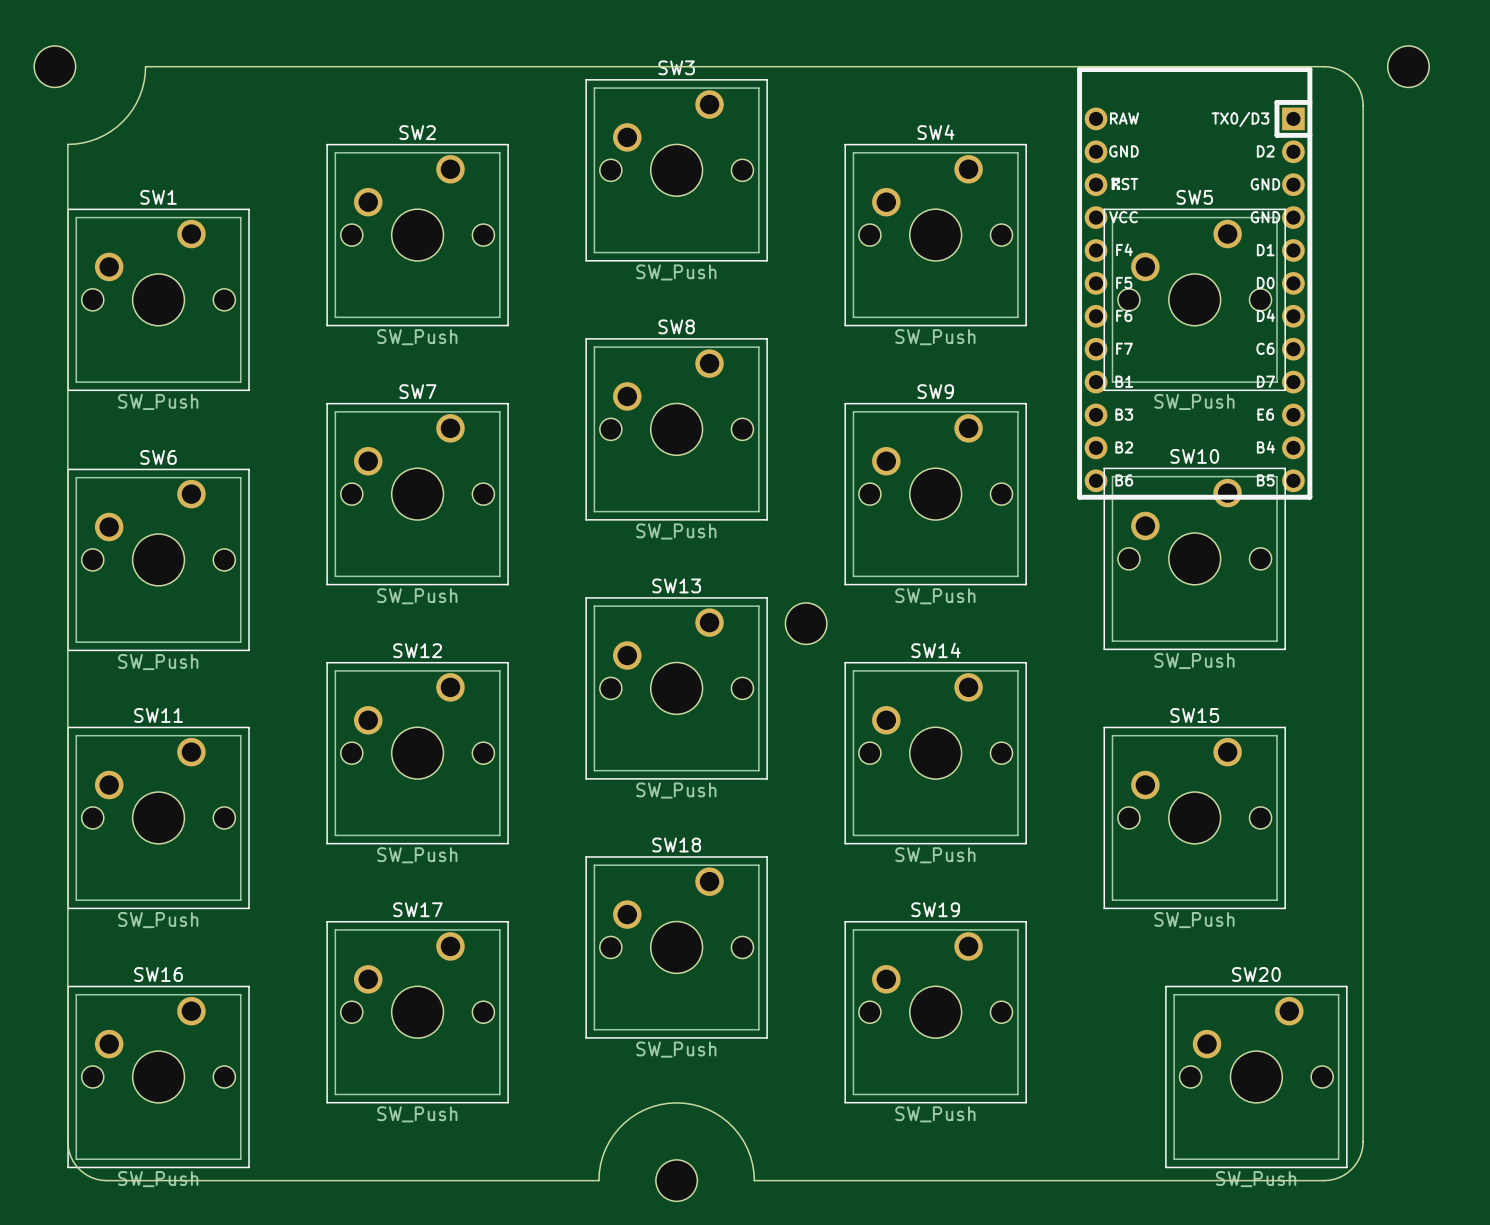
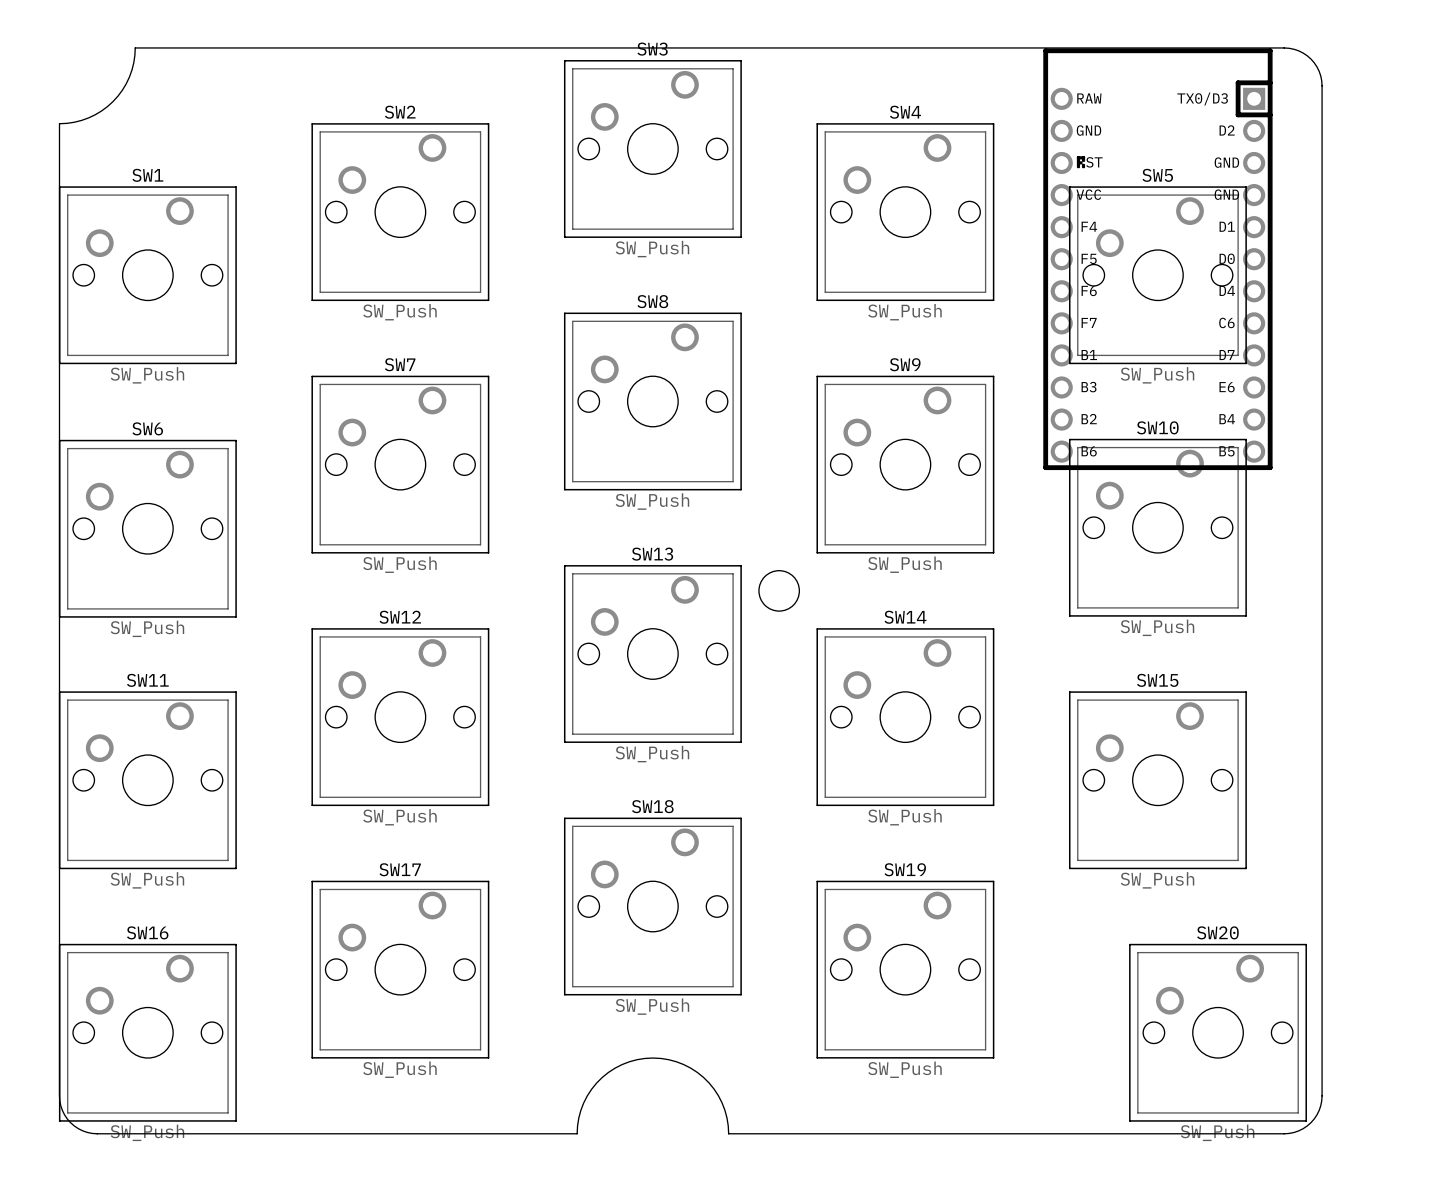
part: (54, 66) -> none
part: (1408, 66) -> none
part: (676, 1180) -> none

